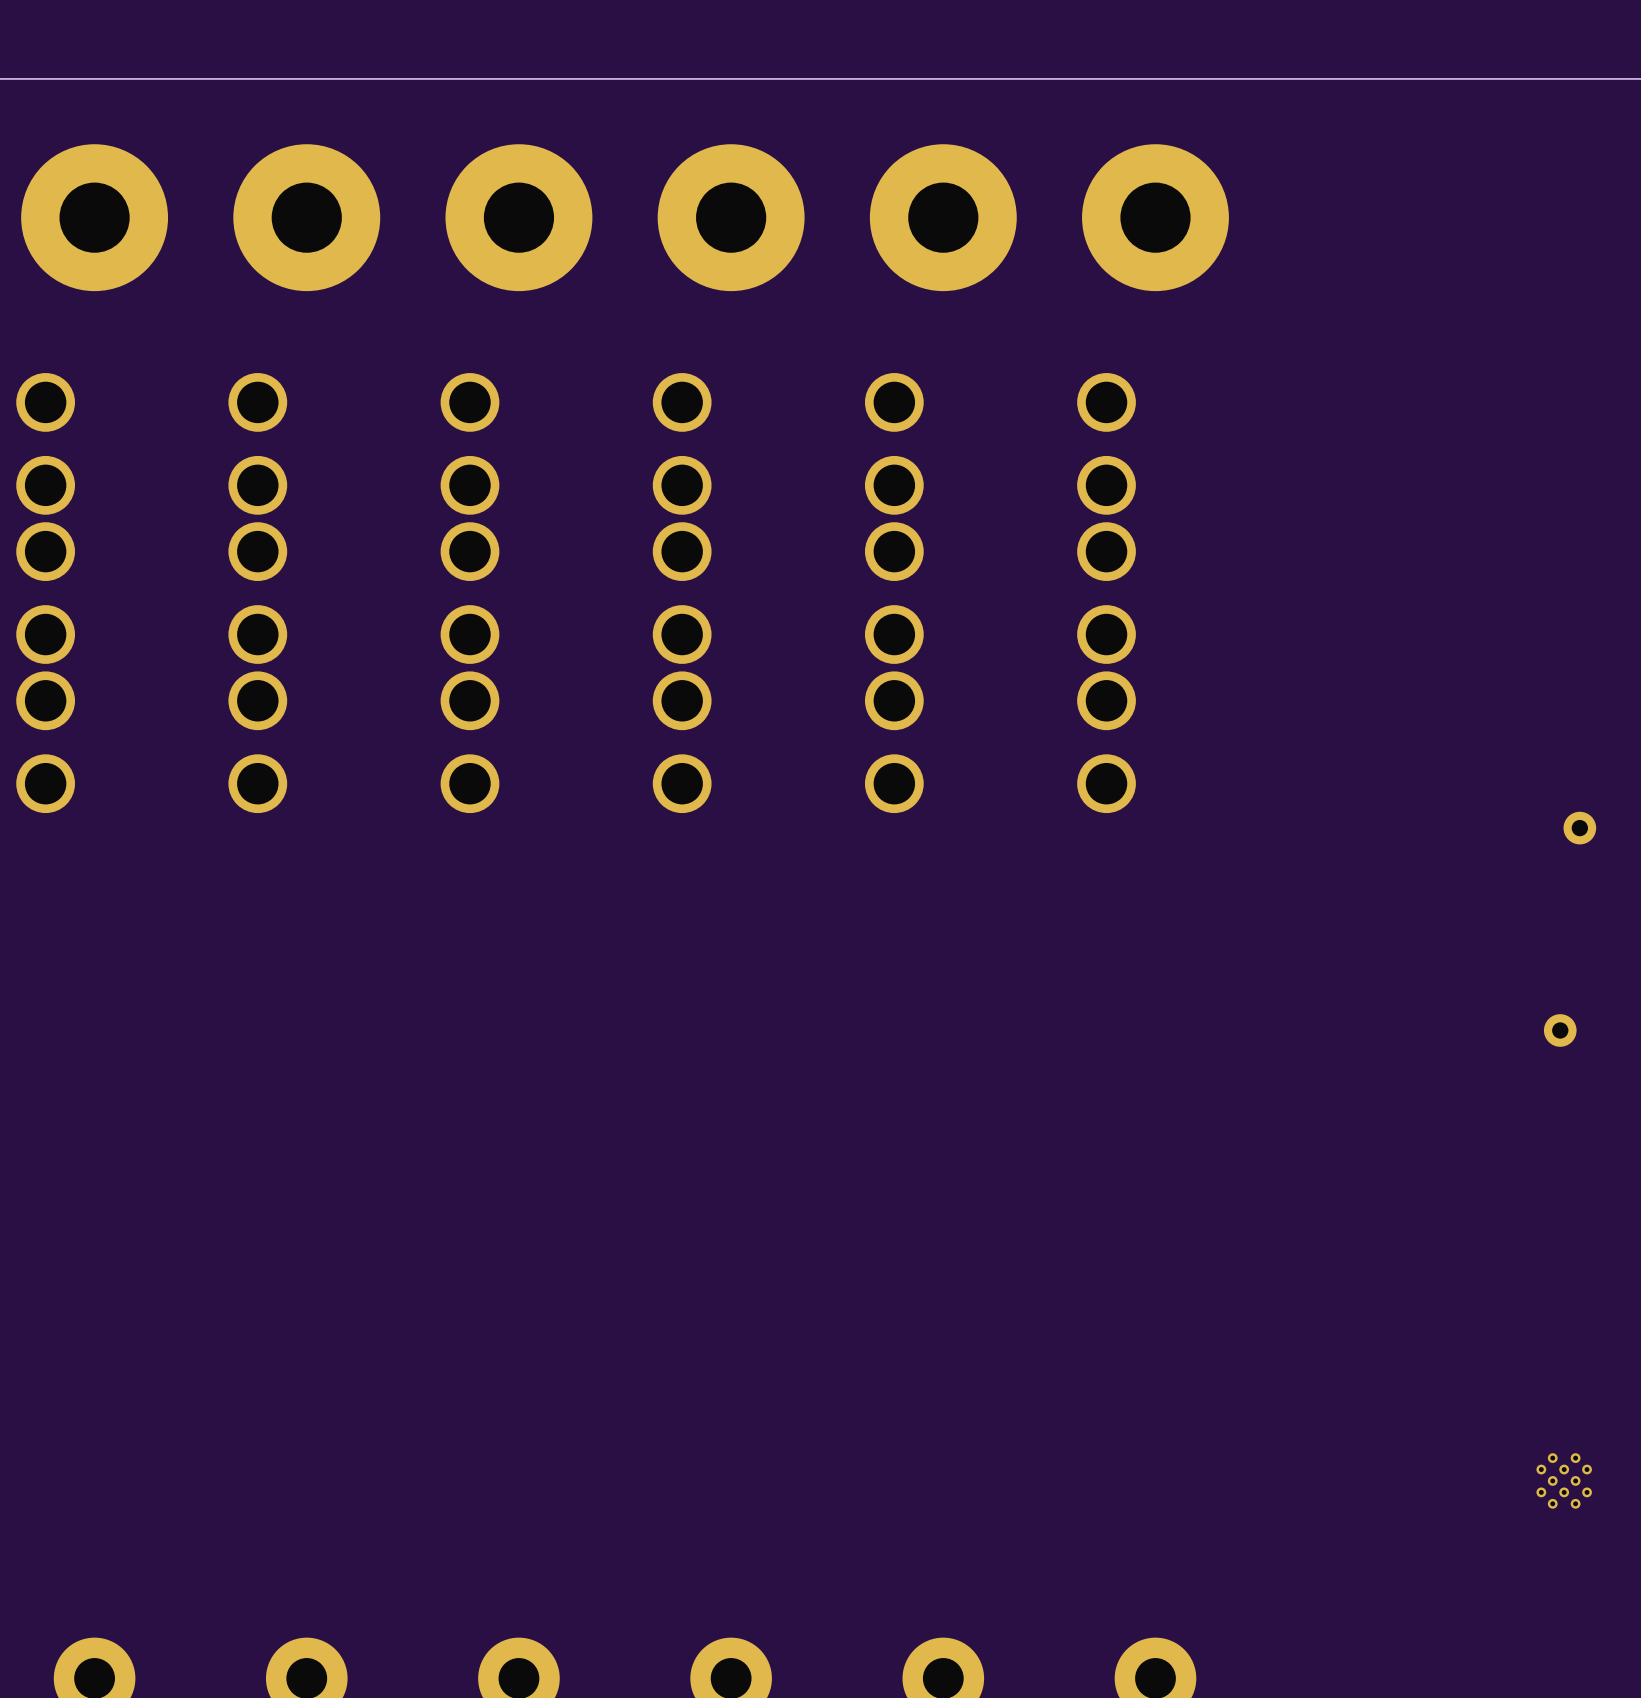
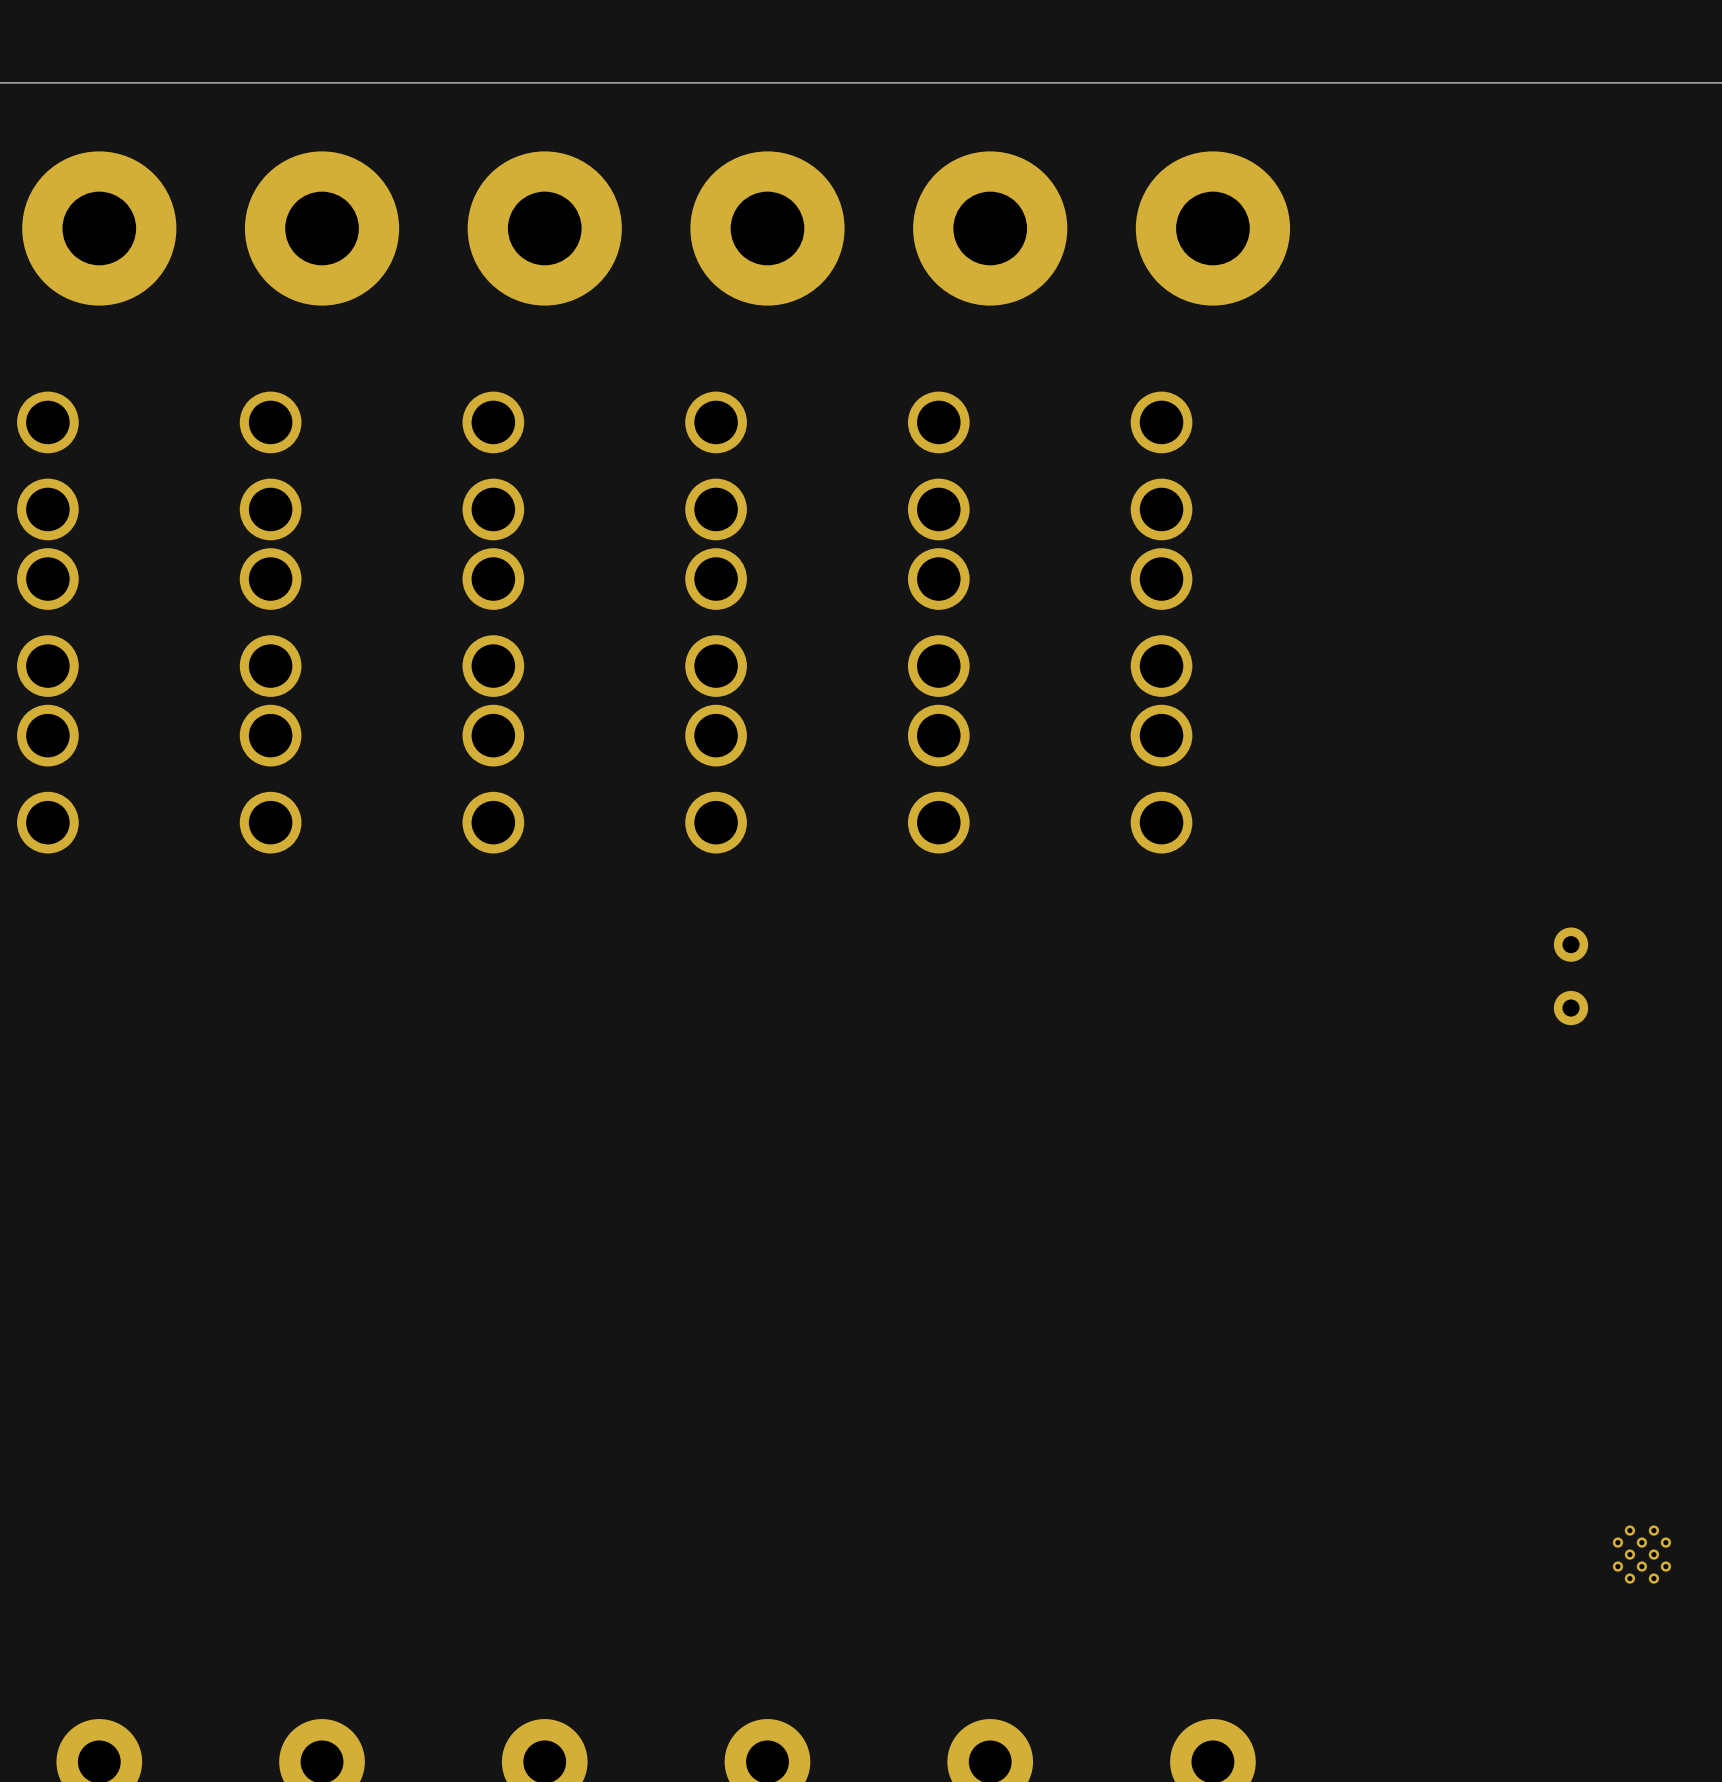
part: (1579, 828) -> none
part: none -> (1571, 944)
part: none -> (1571, 1008)
part: (1560, 1030) -> none

